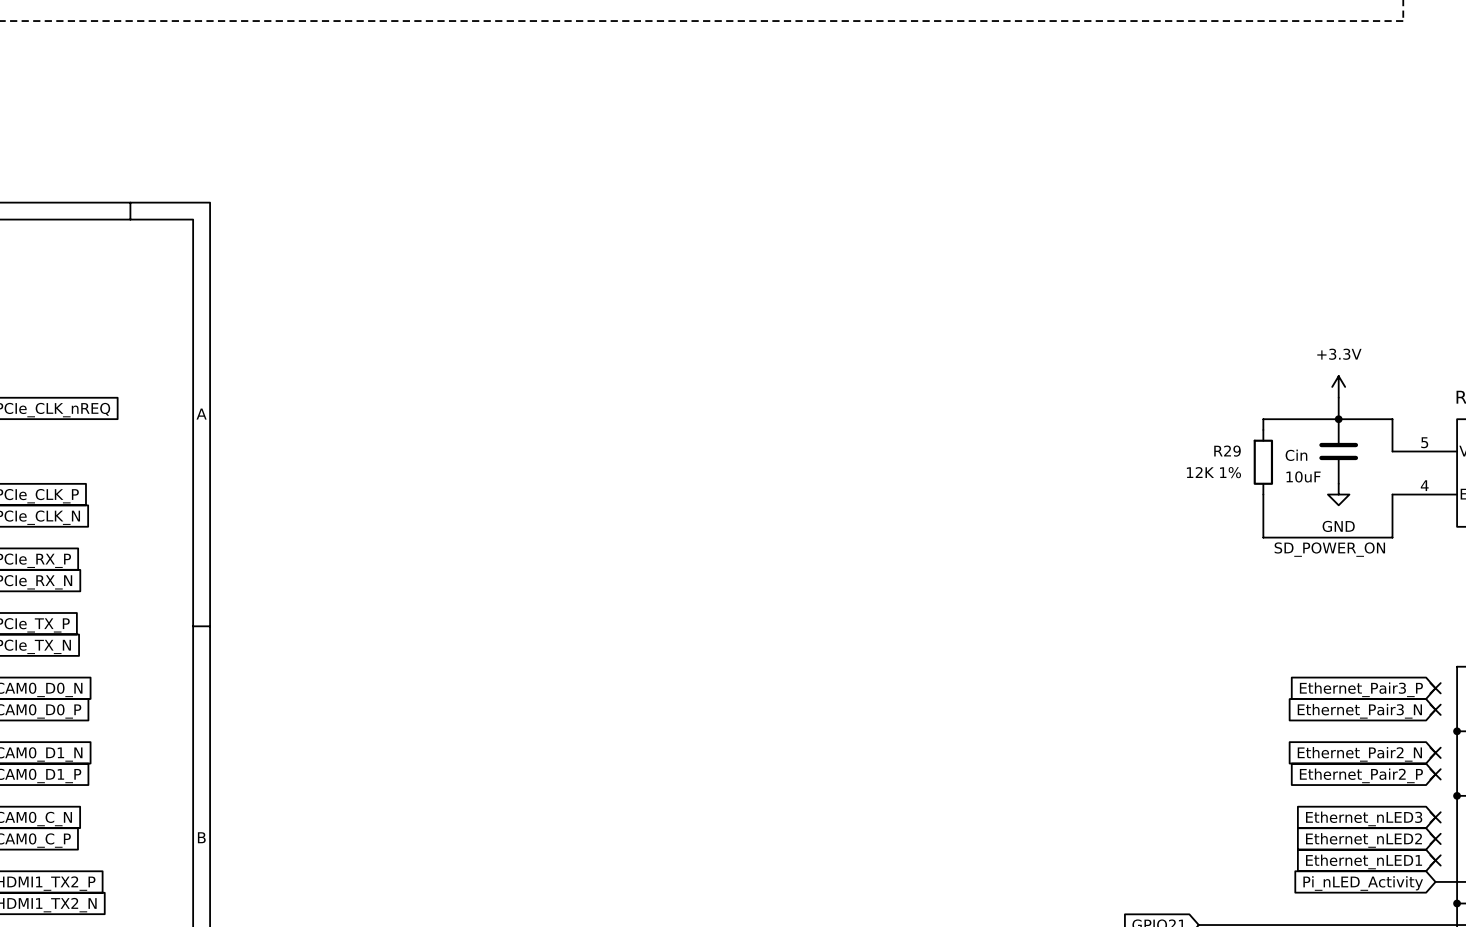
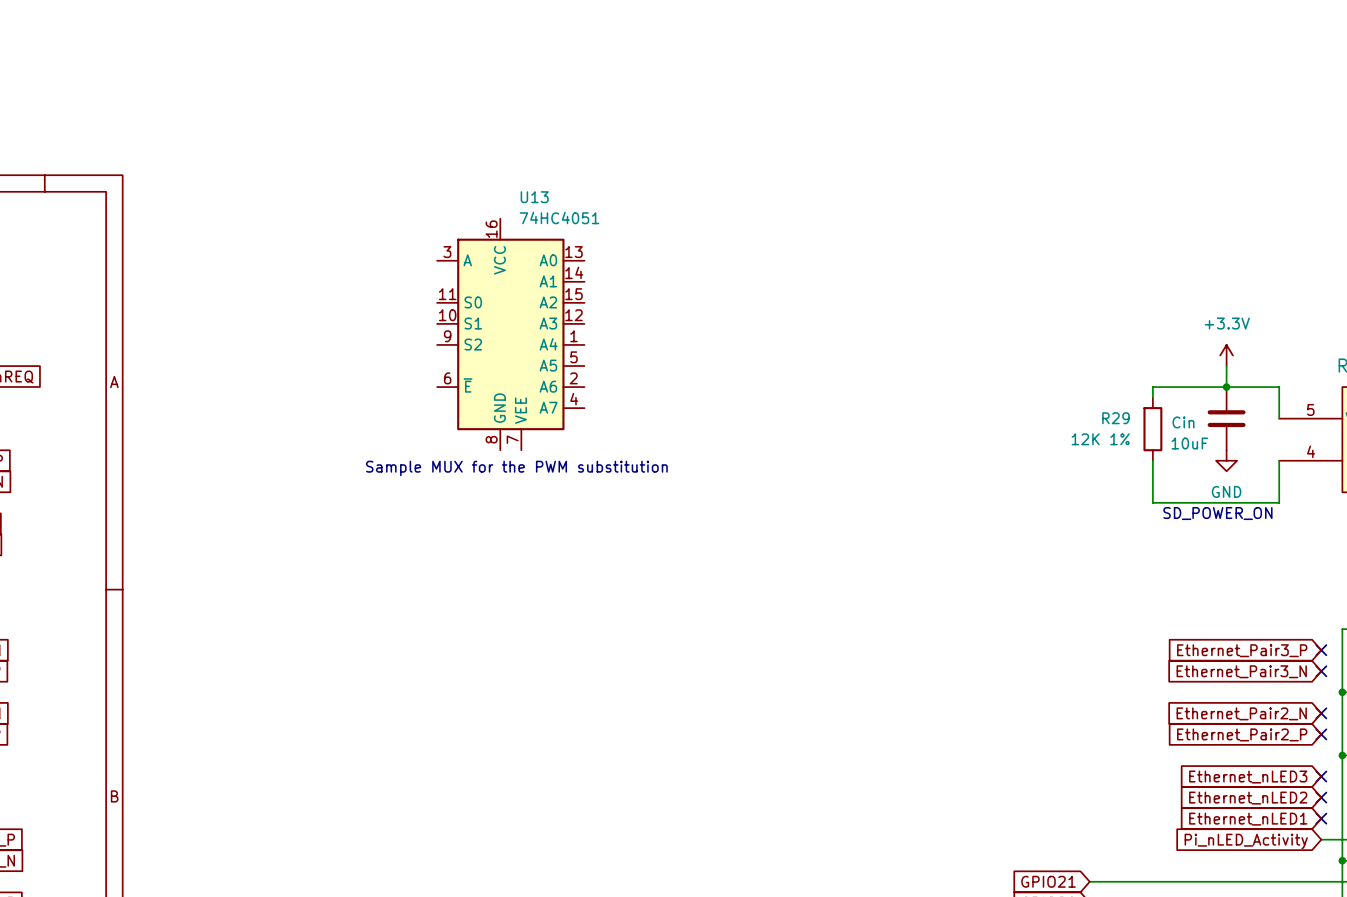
U13: none -> 74HC4051 (510, 334)
text: none -> Sample MUX for the PWM substitution (516, 468)

